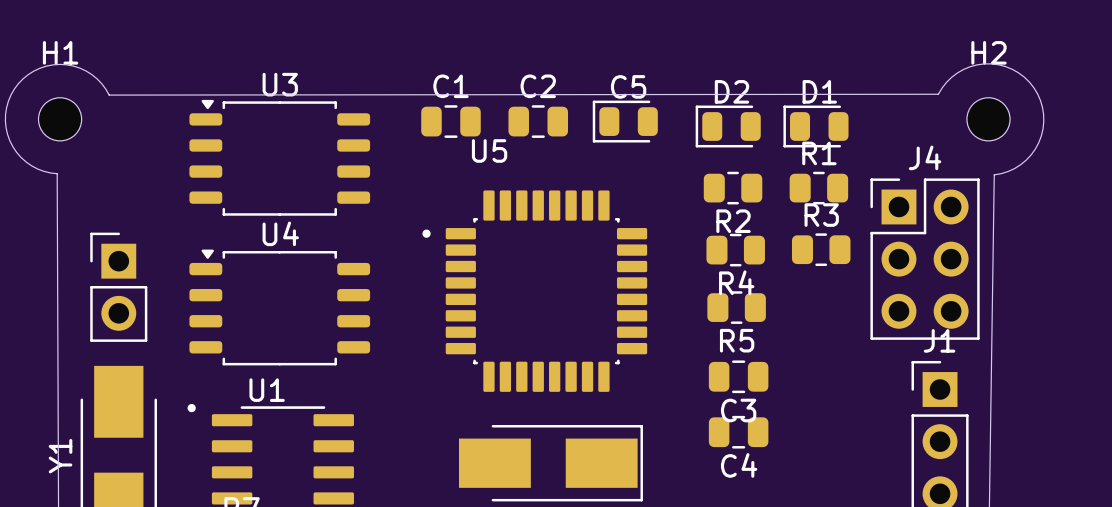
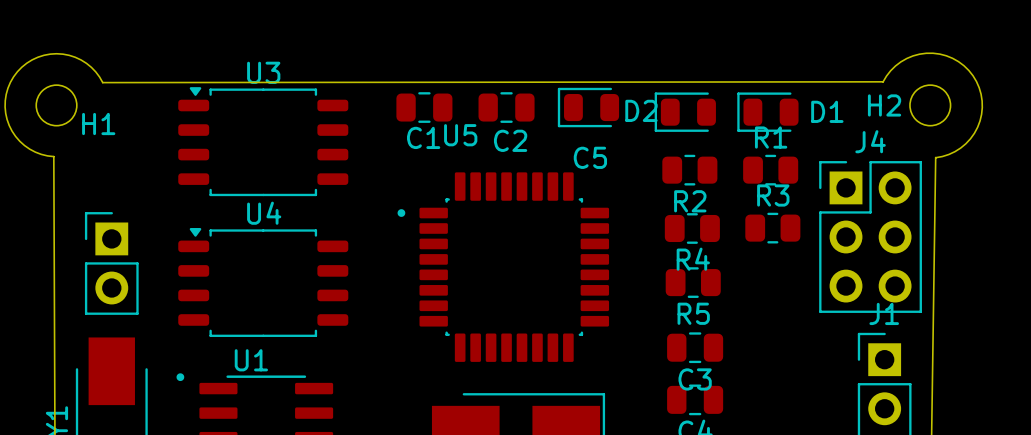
H1 name position: H1 (60, 52) -> H1 (98, 124)
H2 name position: H2 (988, 52) -> H2 (884, 105)
C1 name position: C1 (450, 86) -> C1 (423, 137)
C2 name position: C2 (538, 86) -> C2 (510, 140)
C5 name position: C5 (628, 86) -> C5 (590, 157)
D2 name position: D2 (731, 91) -> D2 (641, 110)
D1 name position: D1 (819, 91) -> D1 (827, 111)

